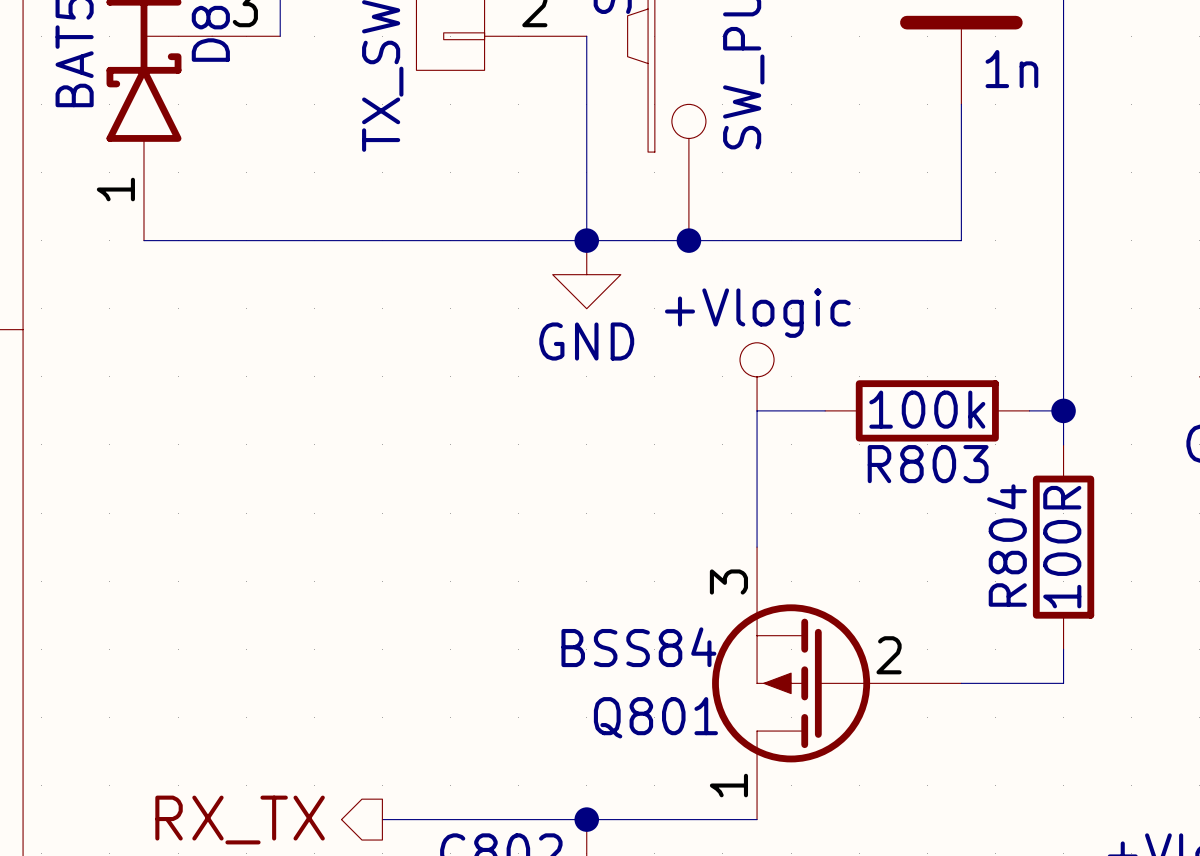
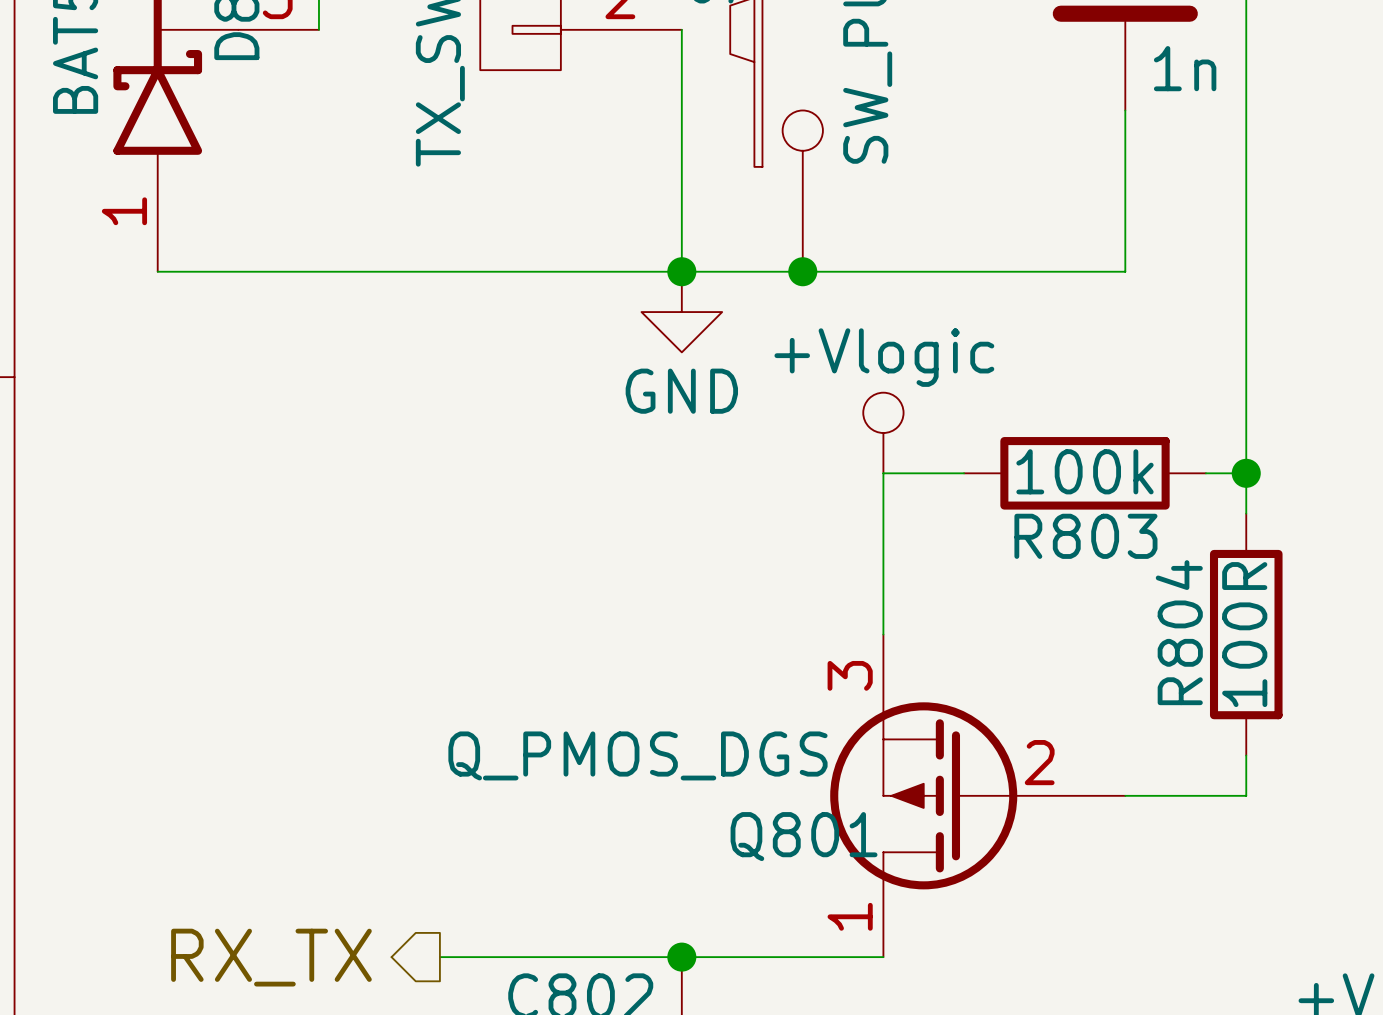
Q801 value: BSS84 (638, 647) -> Q_PMOS_DGS (637, 755)
Q801 name position: Q801 (655, 717) -> Q801 (804, 836)

